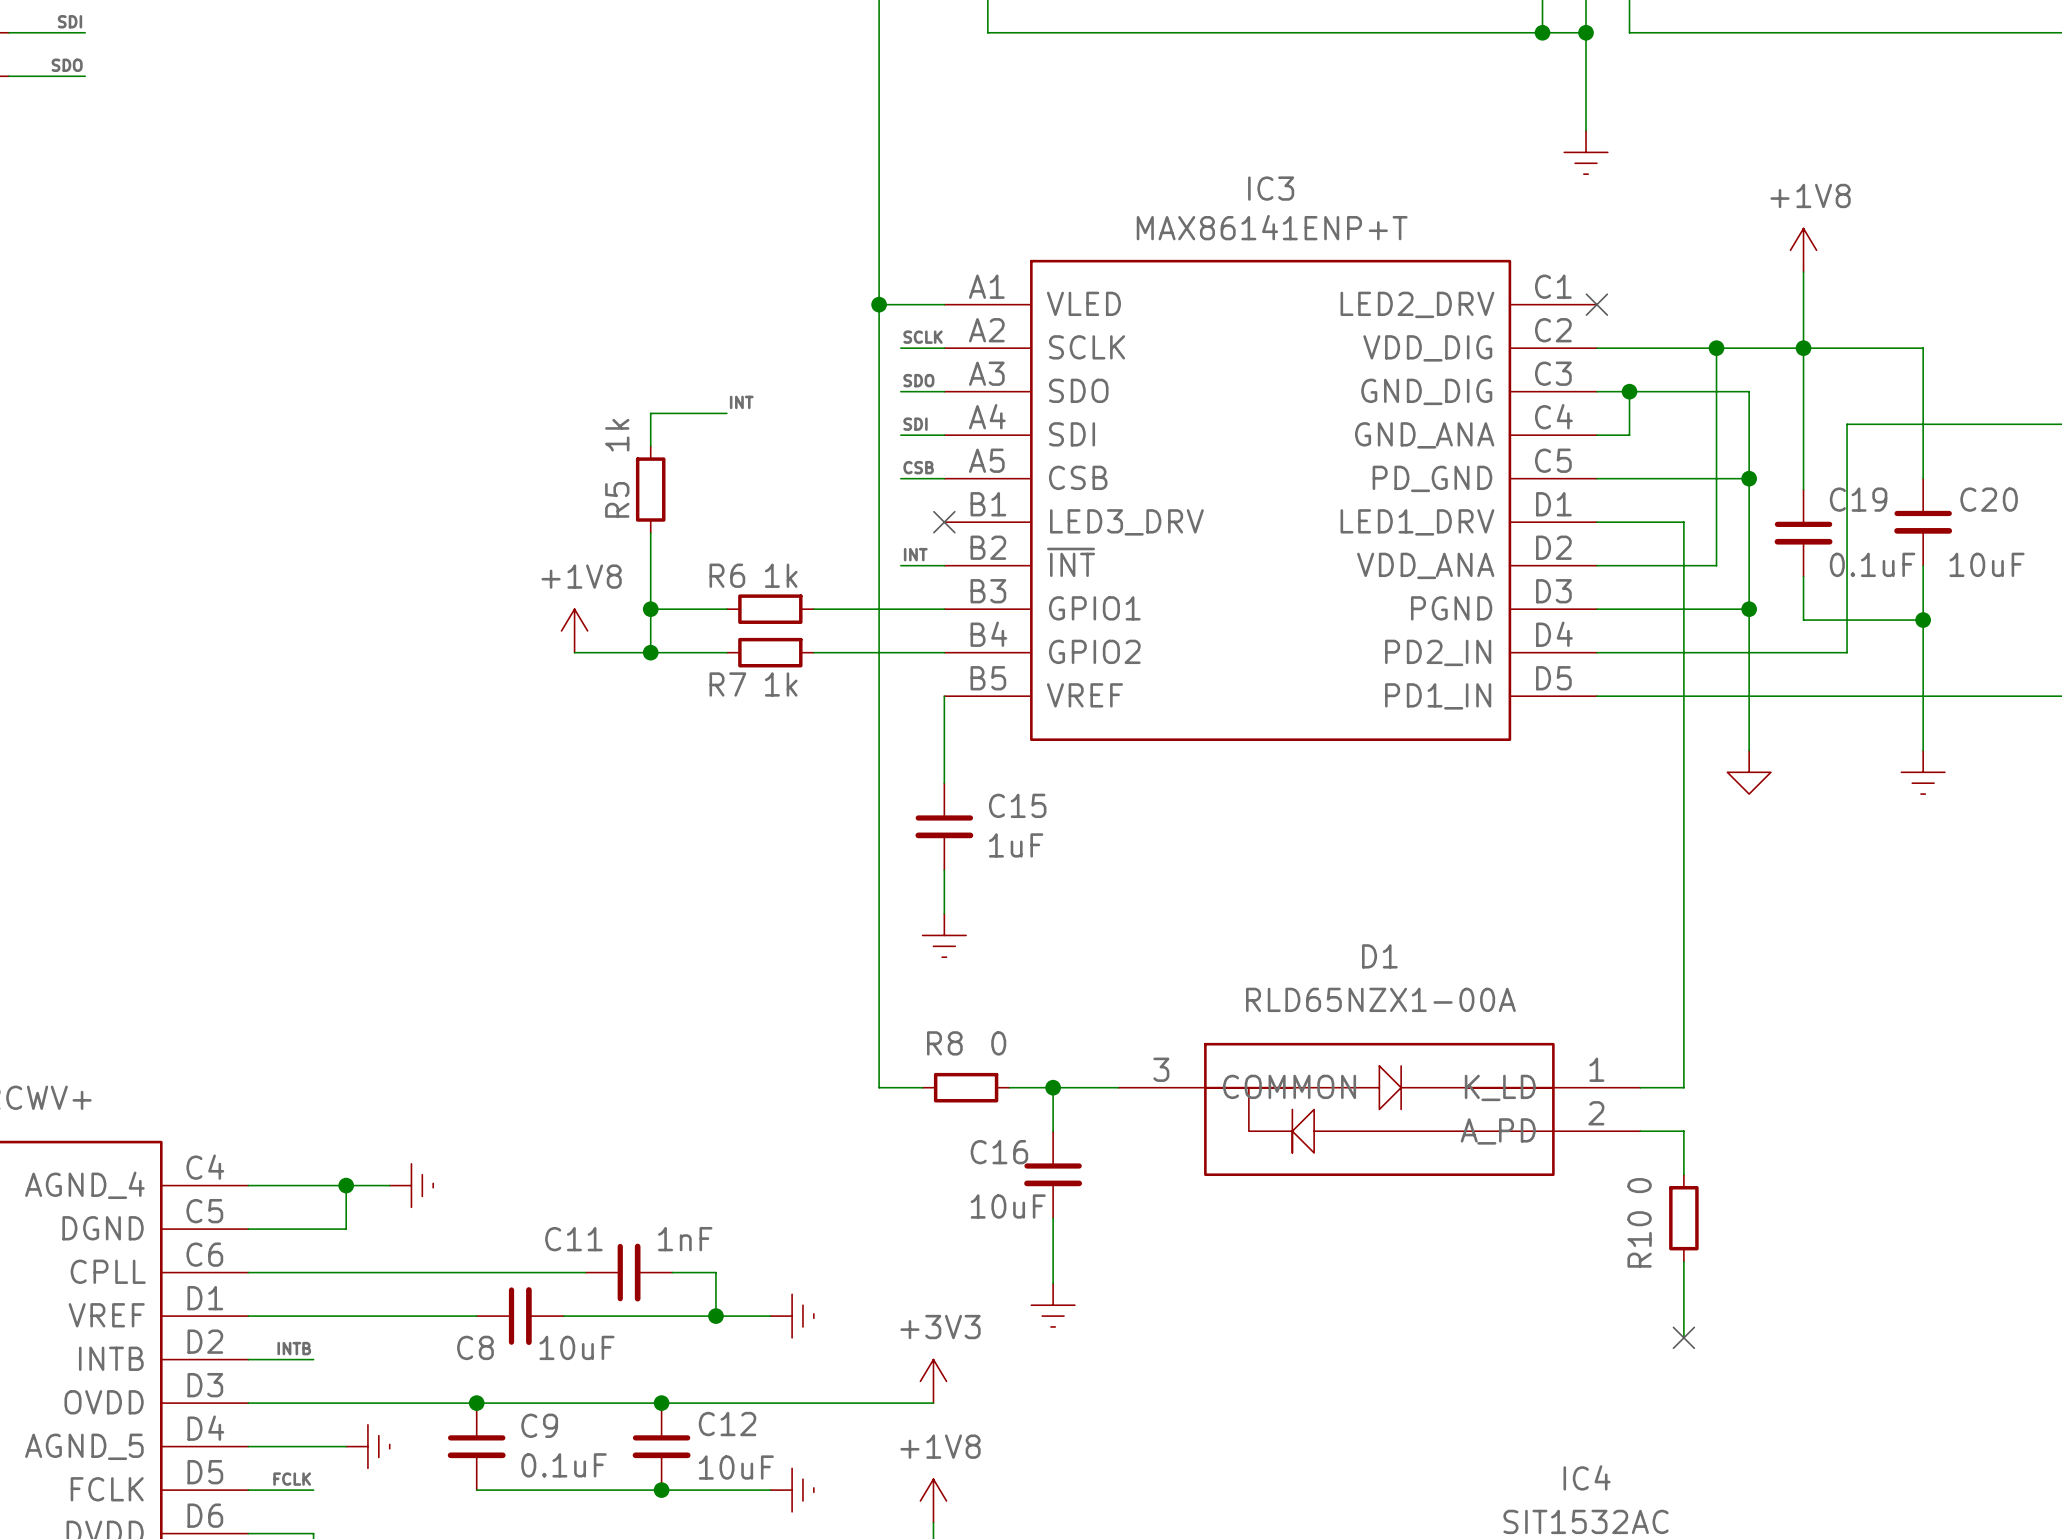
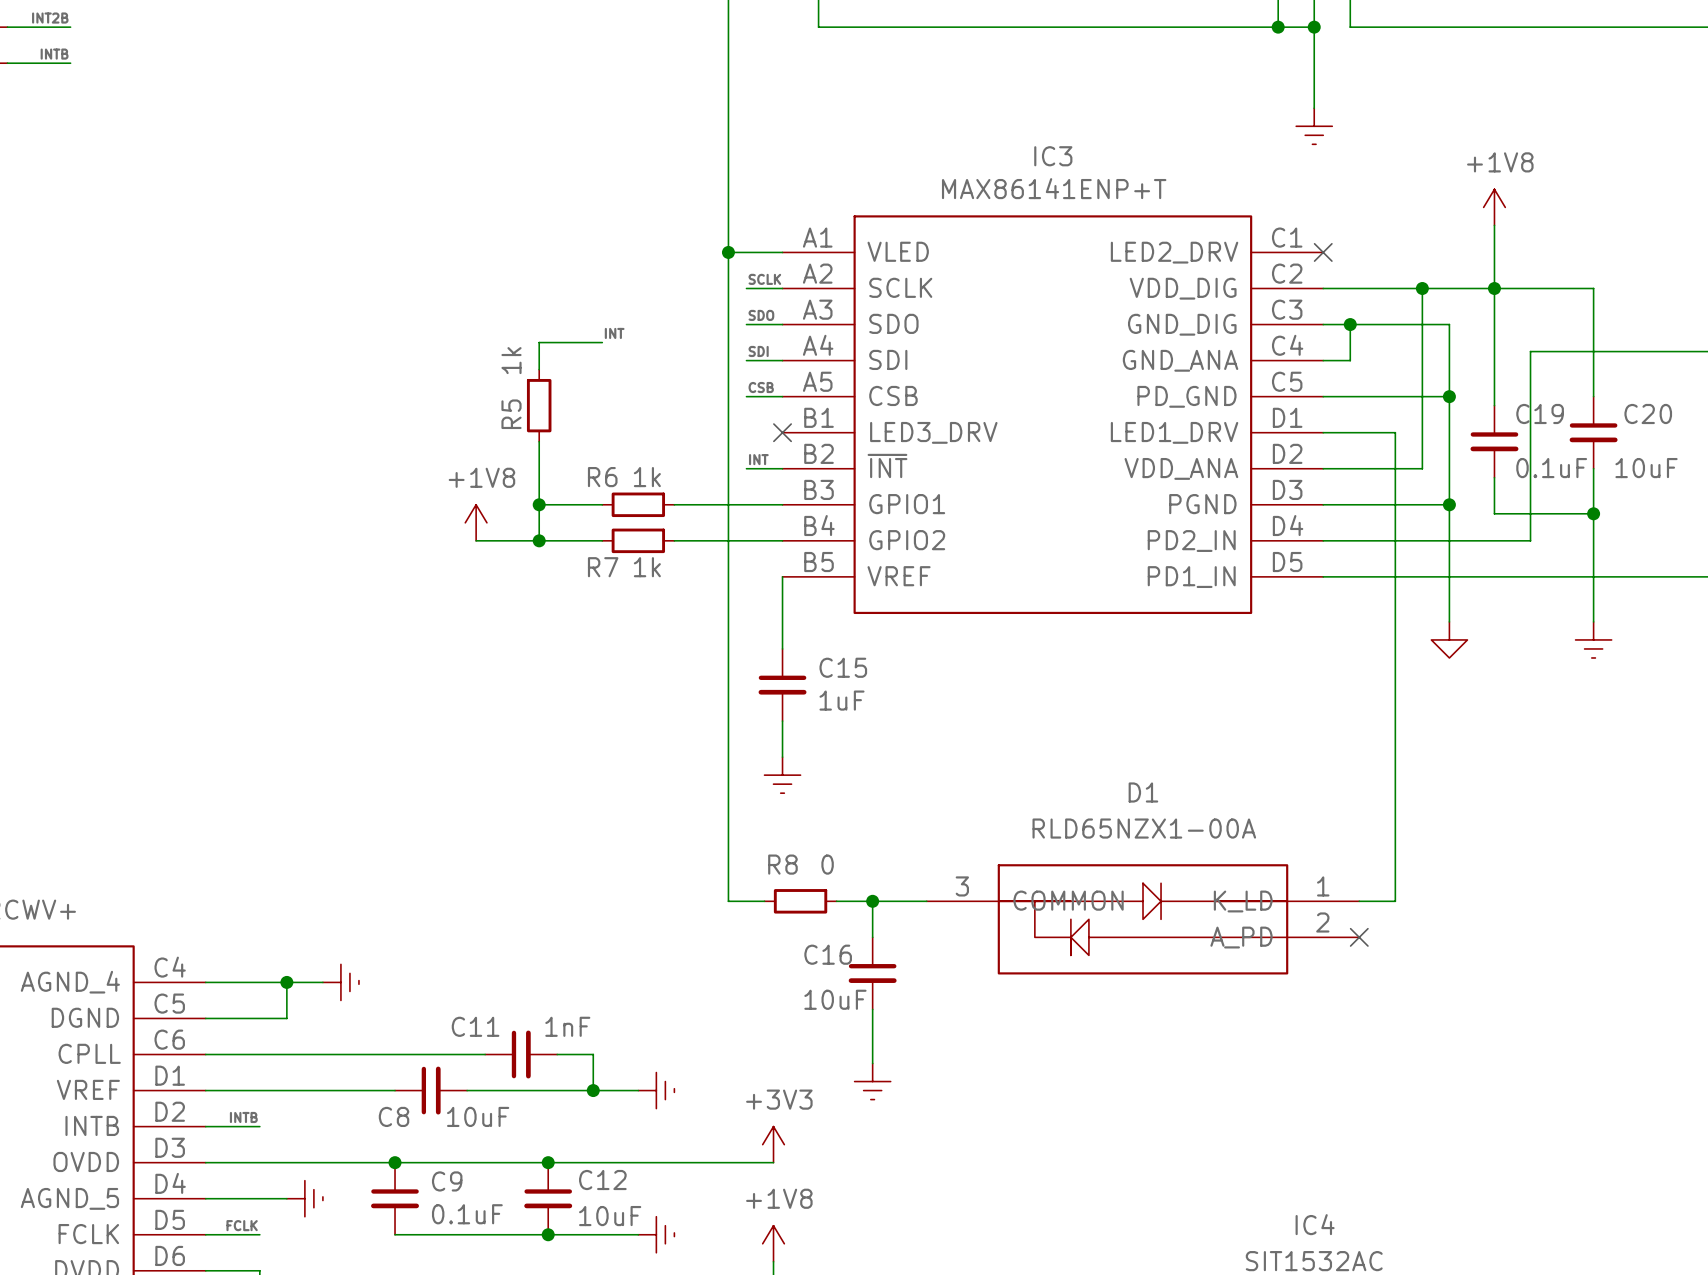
label: SDI (70, 21) -> INT2B (50, 18)
label: SDO (67, 65) -> INTB (54, 54)
wire: (1640, 1131) (1683, 1131) (1683, 1174) -> none
no-connect mark: none -> (1359, 937)
R10: 0 (1683, 1218) -> none
wire: (1683, 1261) (1683, 1337) -> none
no-connect mark: (1683, 1337) -> none

